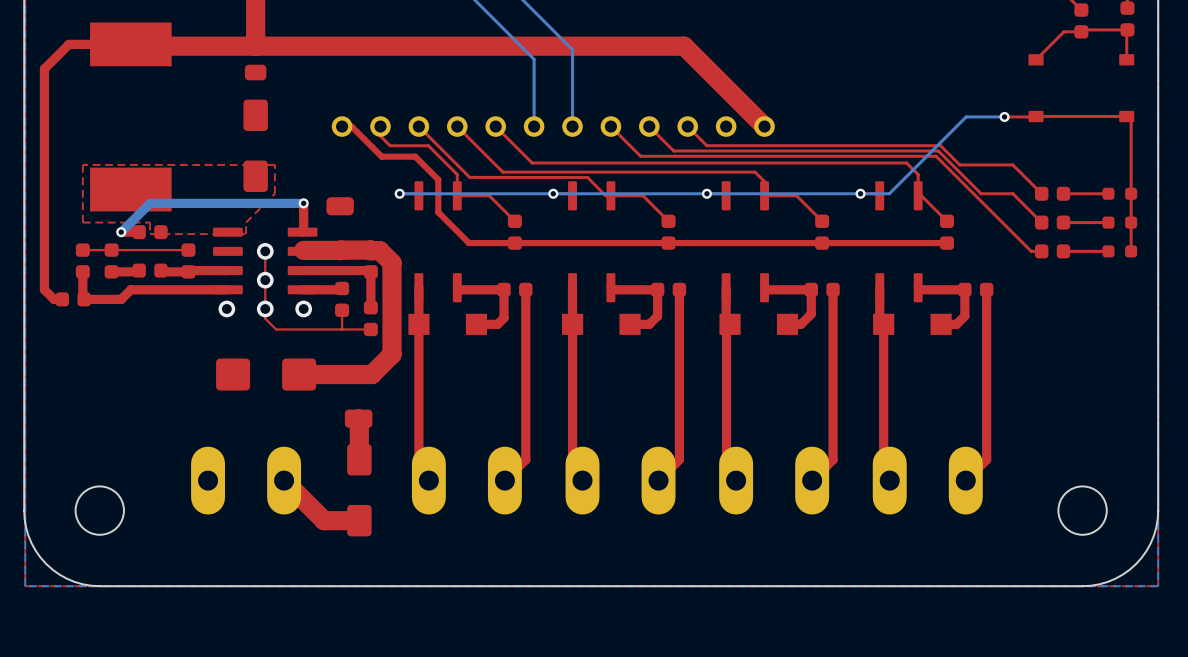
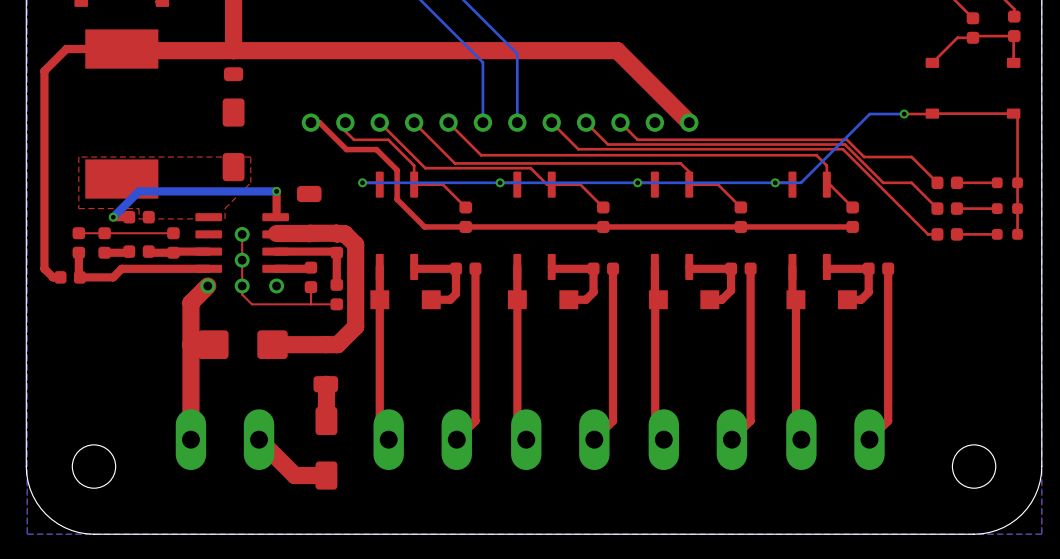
top track: none -> (207, 285) (190, 302) (190, 439)

